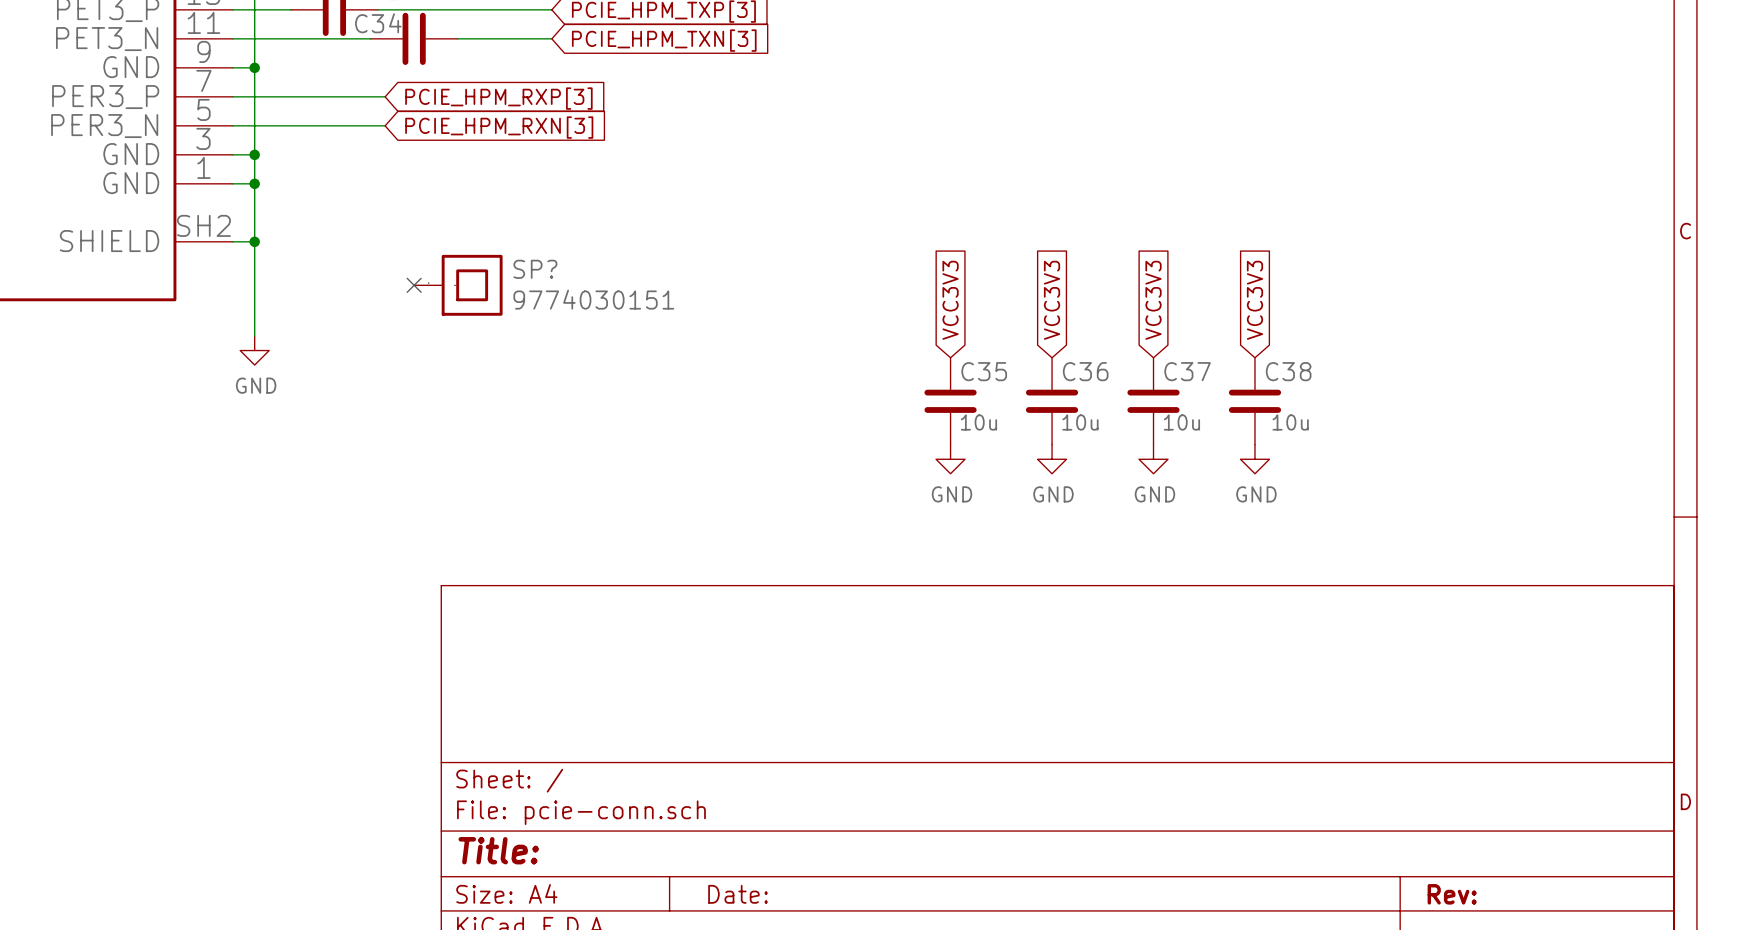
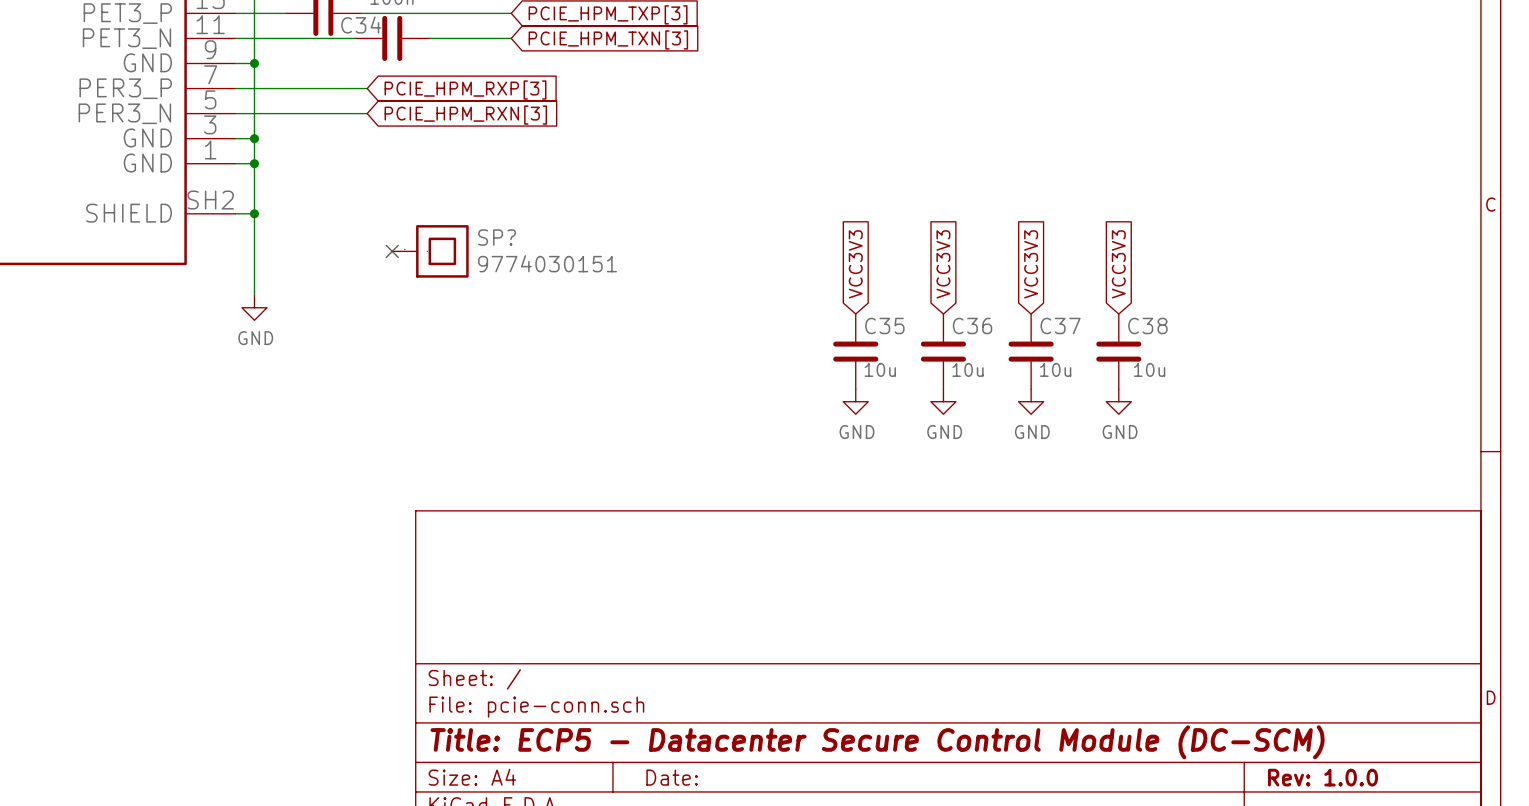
title block: Title: (498, 850) -> Title: ECP5 - Datacenter Secure Control Module (DC-SCM) (877, 742)
title block: Rev: (1452, 894) -> Rev: 1.0.0 (1322, 777)

